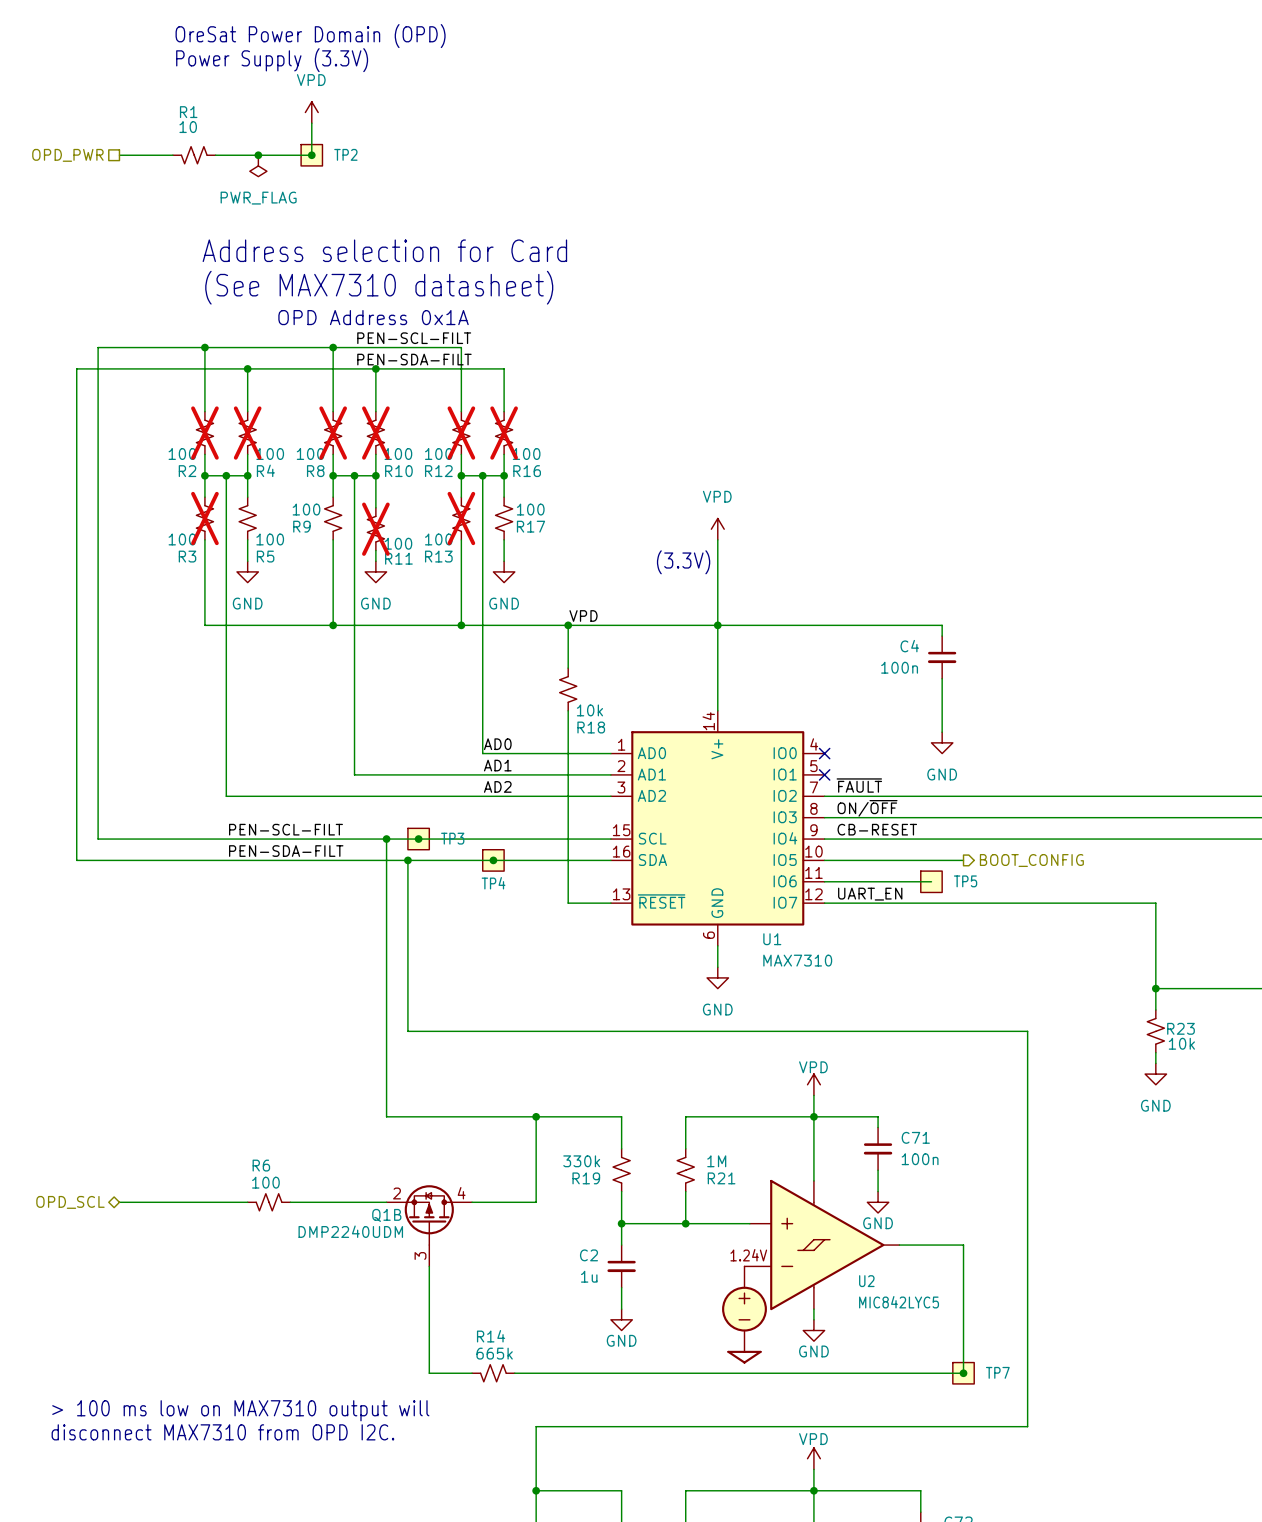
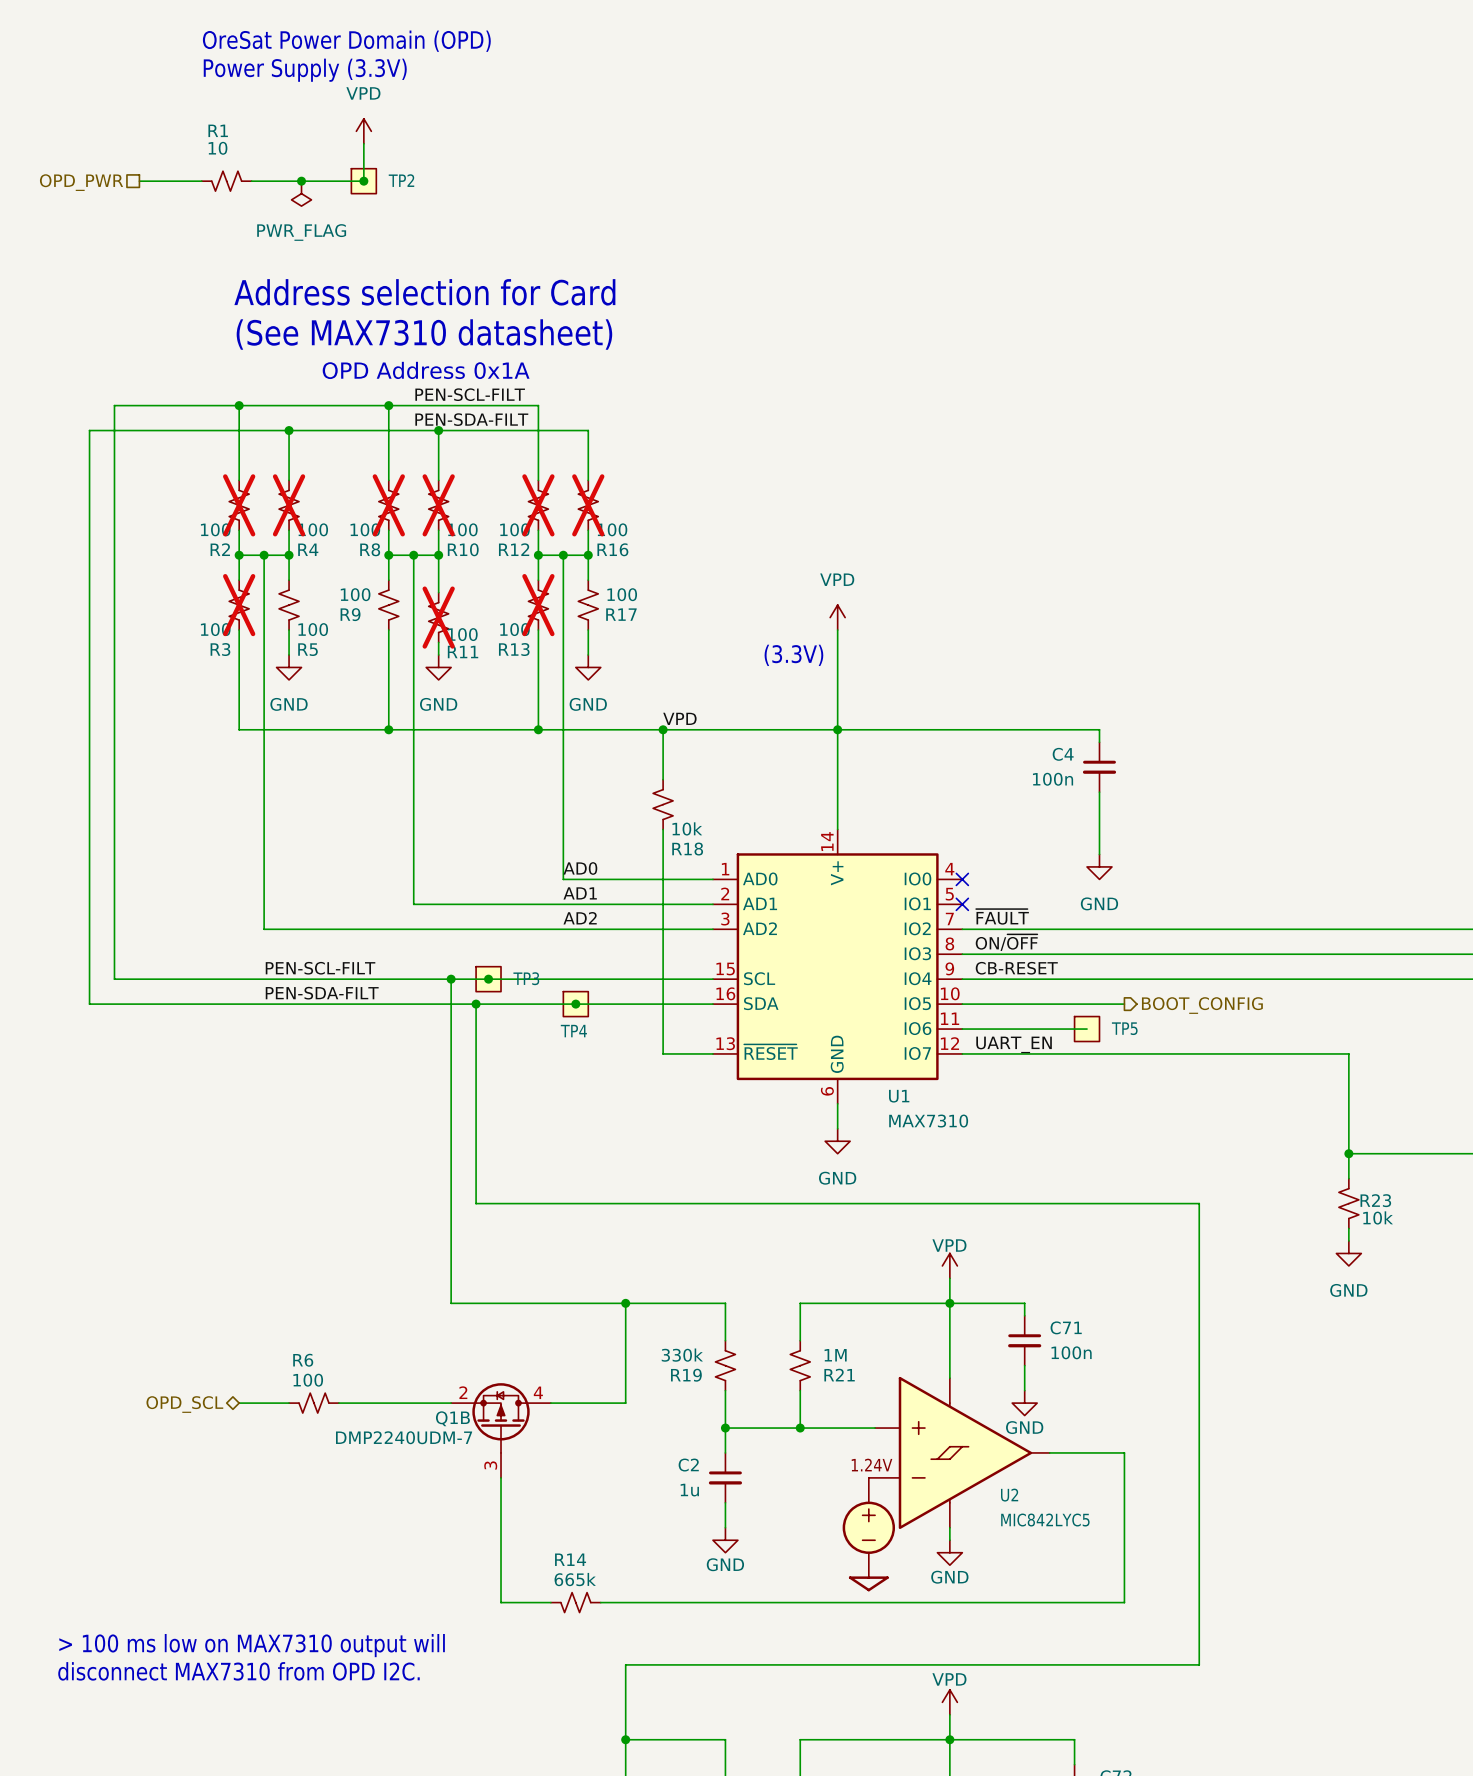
hierarchical label position: OPD_SCL (70, 1202) -> OPD_SCL (184, 1404)
wire: (119, 1202) (204, 1202) -> none
Q1B value: DMP2240UDM (350, 1231) -> DMP2240UDM-7 (404, 1437)
junction: (963, 1373) -> none
TP7: (963, 1373) -> none

